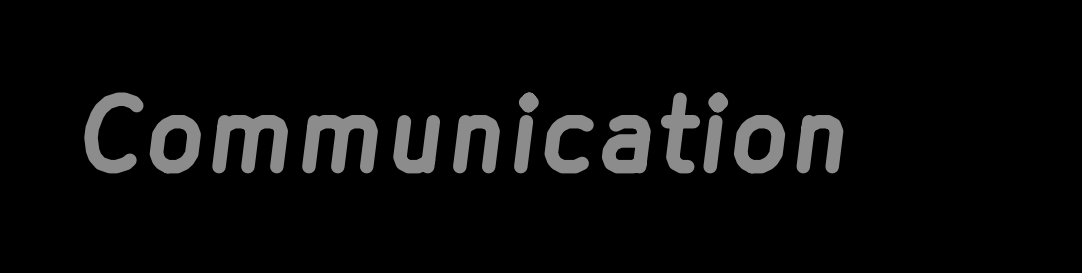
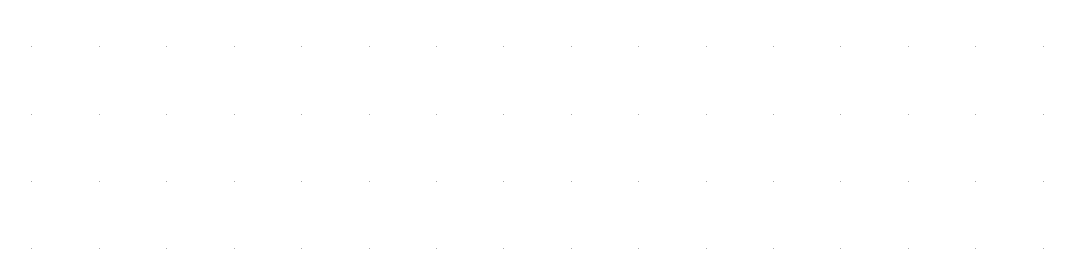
text: Communication (463, 132) -> none

